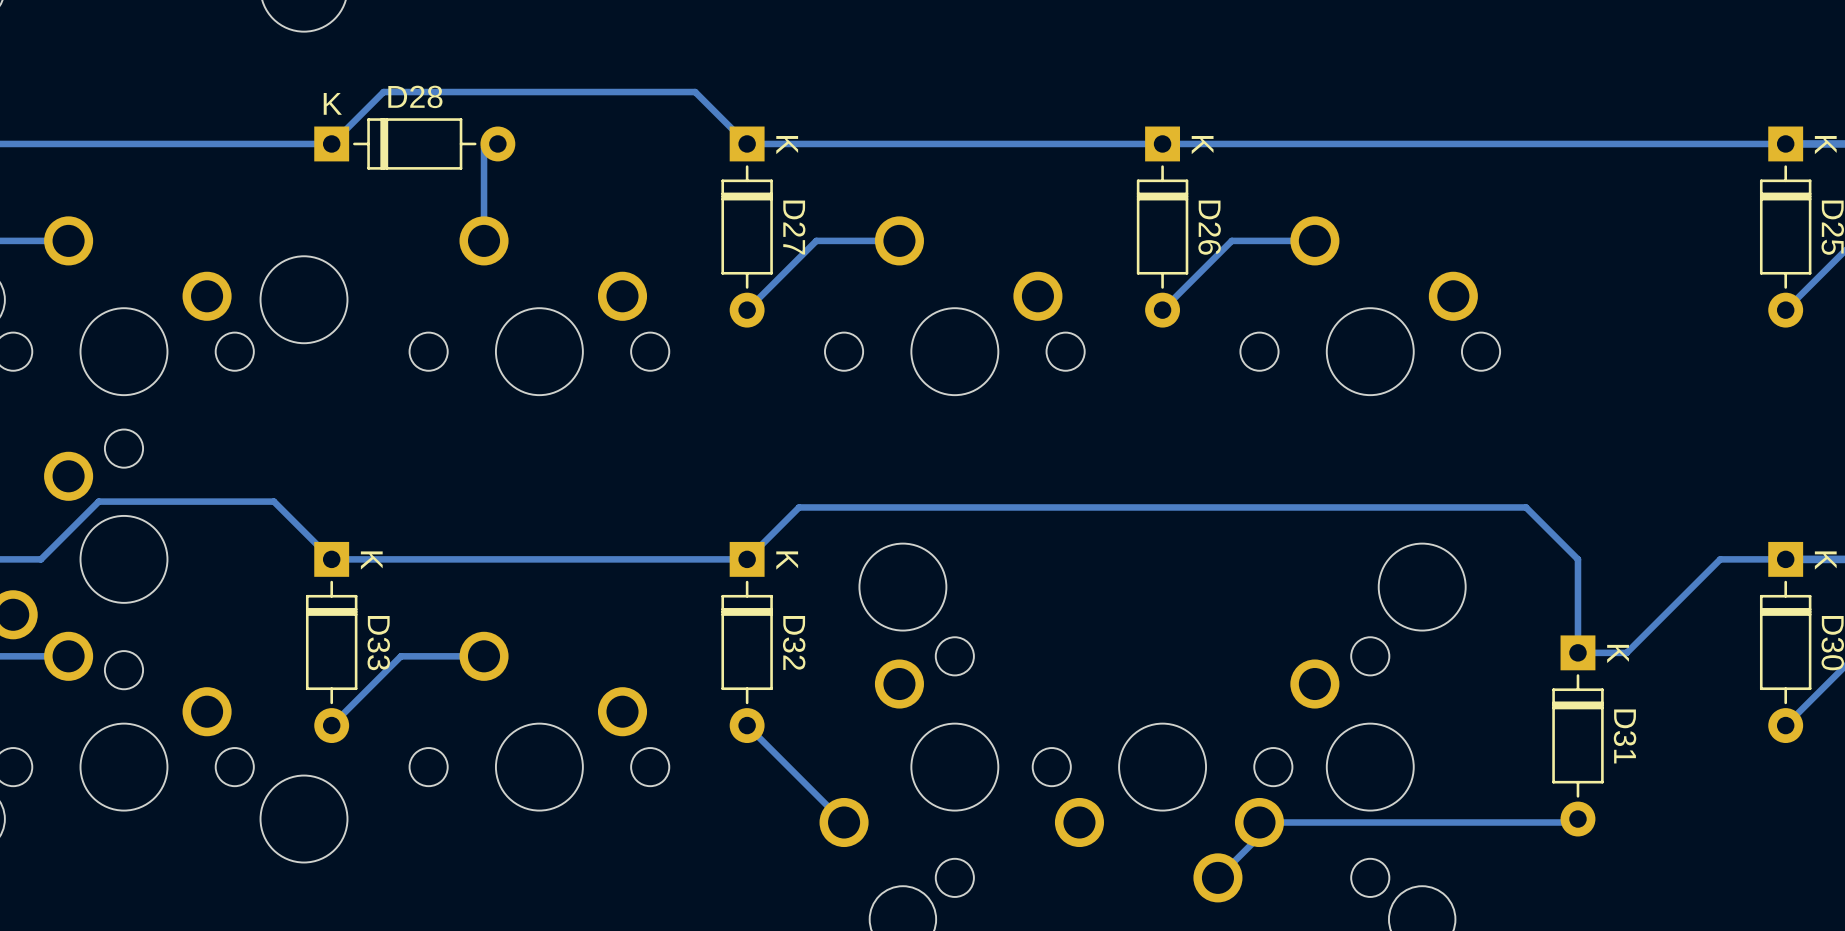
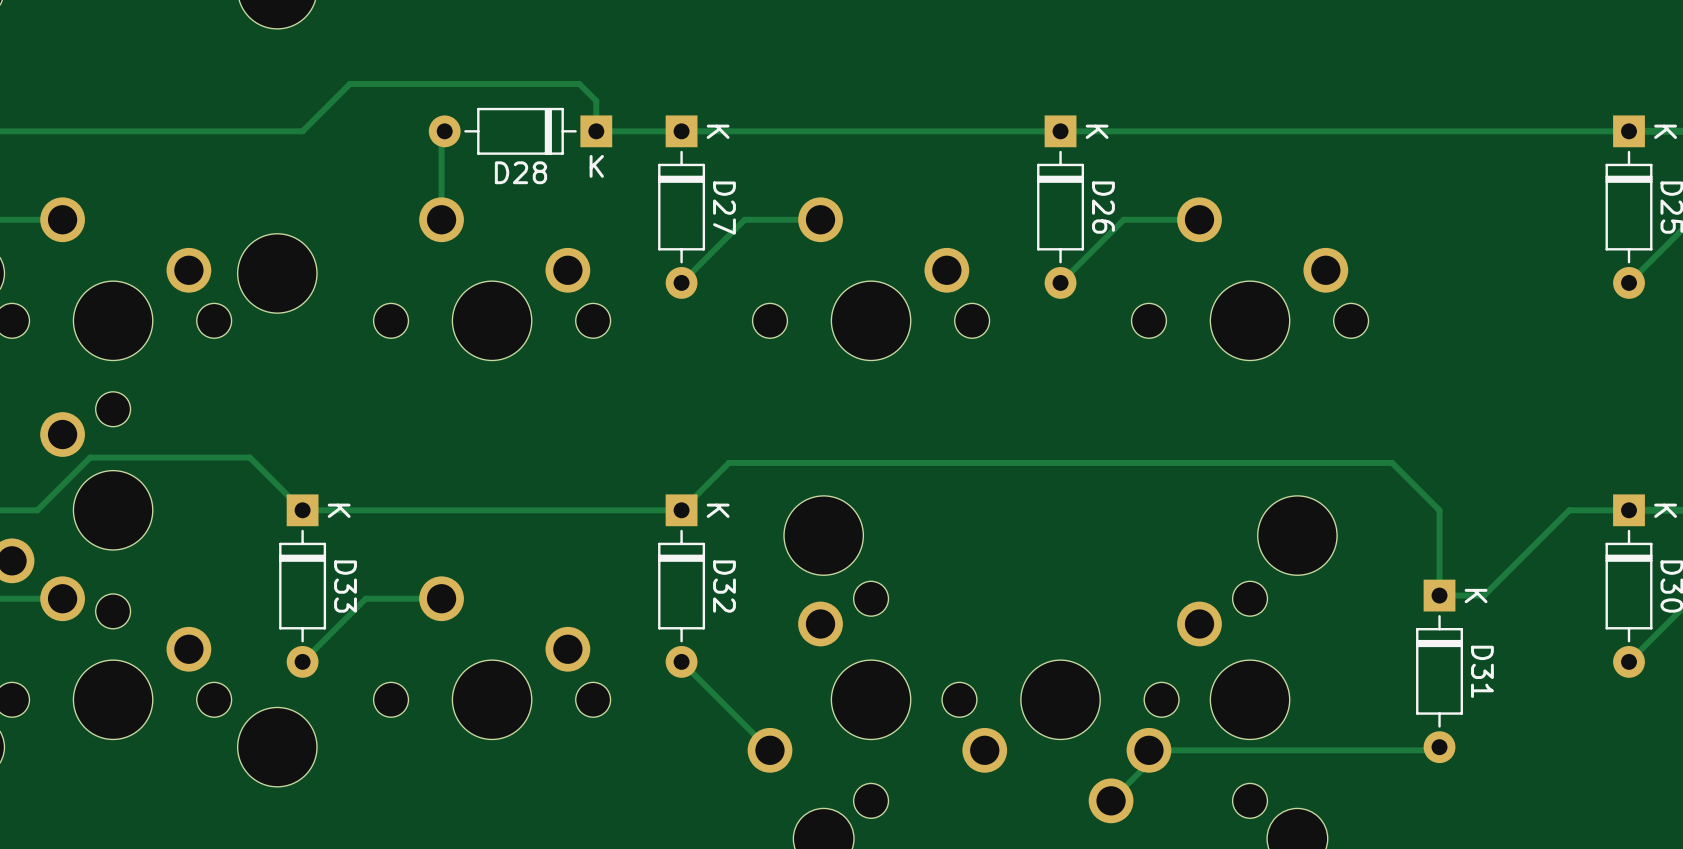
track: (635, 92) (695, 92) (747, 143) -> (579, 83) (596, 100) (596, 131) (681, 131)
D28 rotation: 0° (414, 143) -> 180° (520, 131)
D28 position: (414, 143) -> (520, 131)

